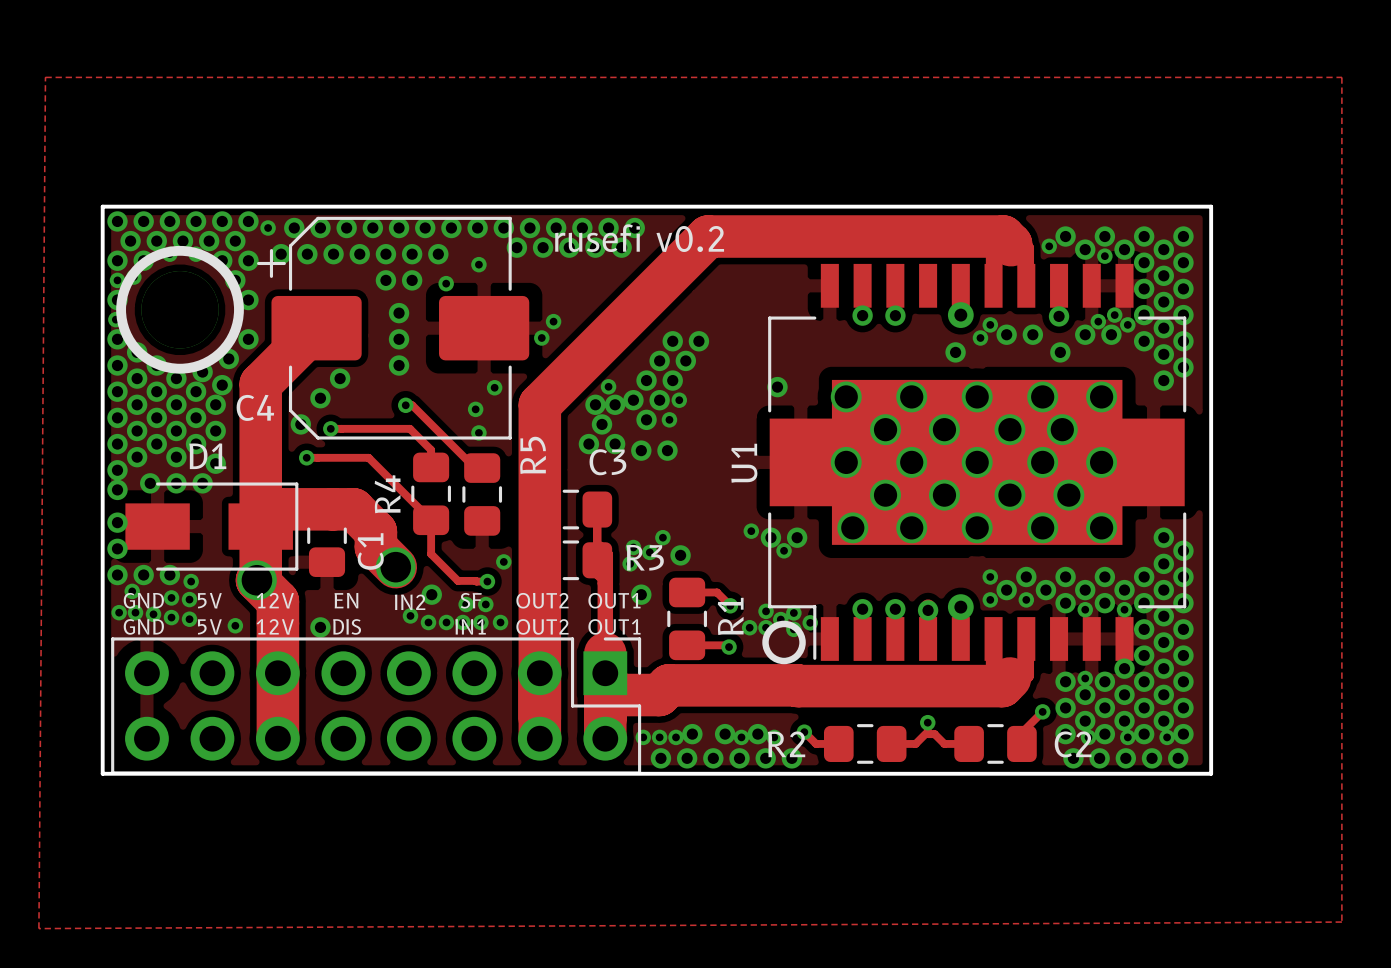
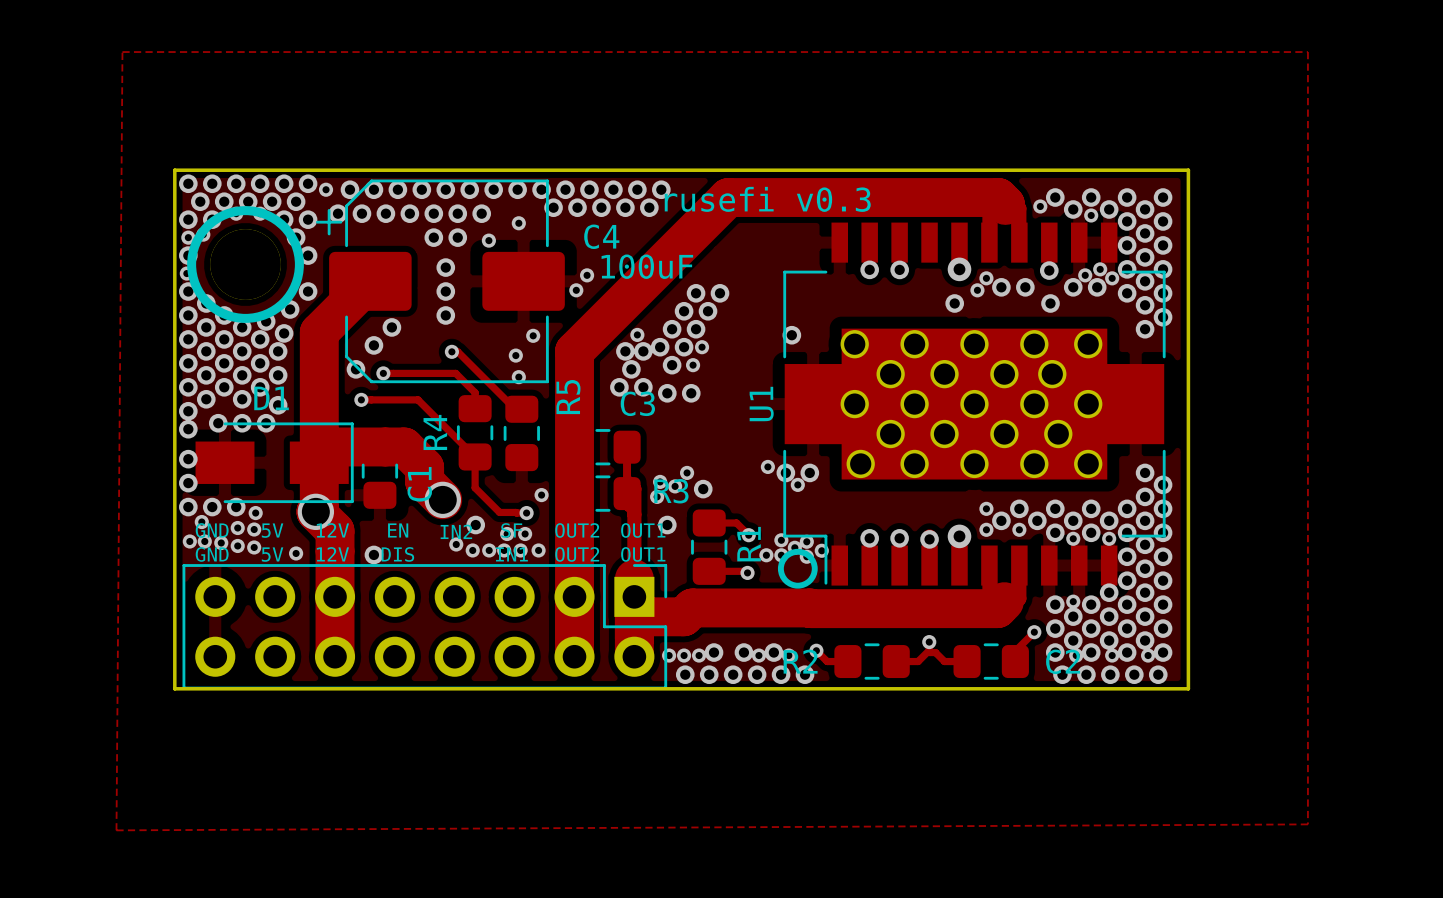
text: rusefi v0.2 (639, 238) -> rusefi v0.3 (767, 199)
C4 value: none -> 100uF (647, 266)
C4 name position: C4 (255, 407) -> C4 (601, 236)

